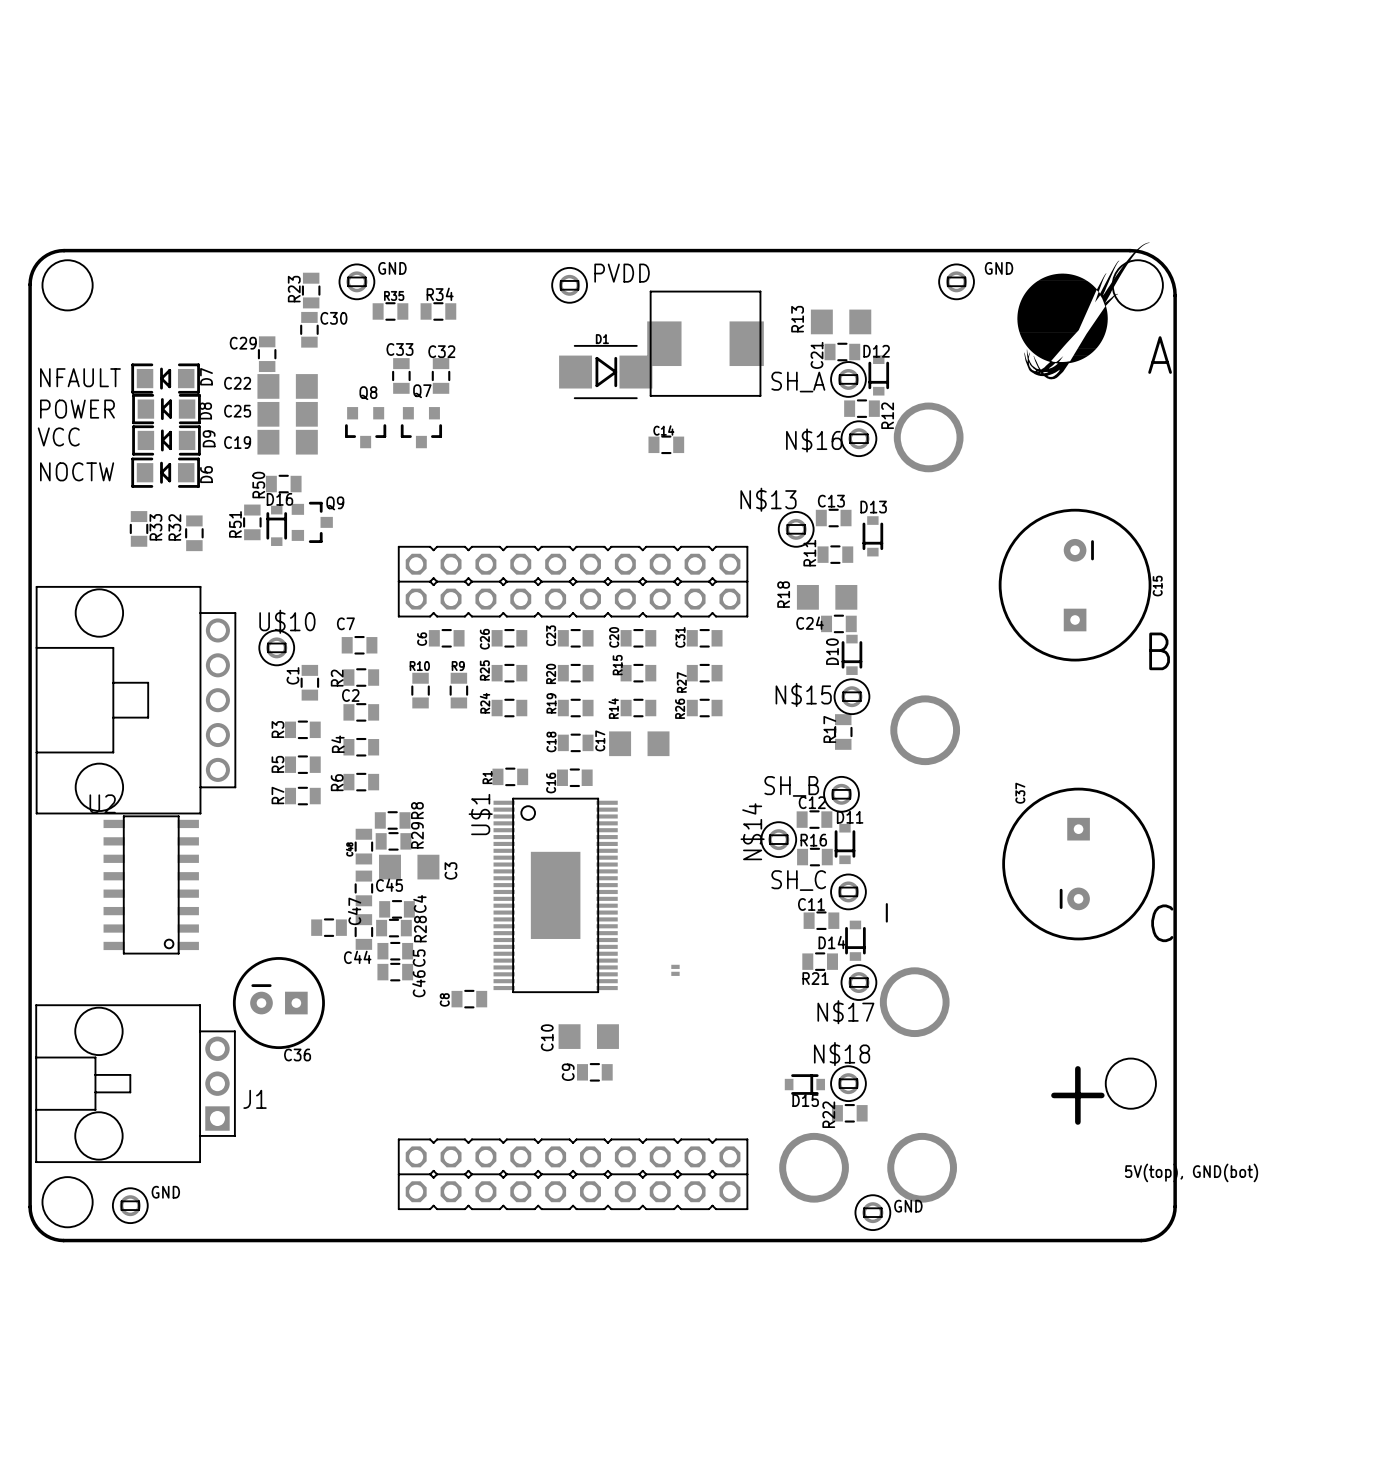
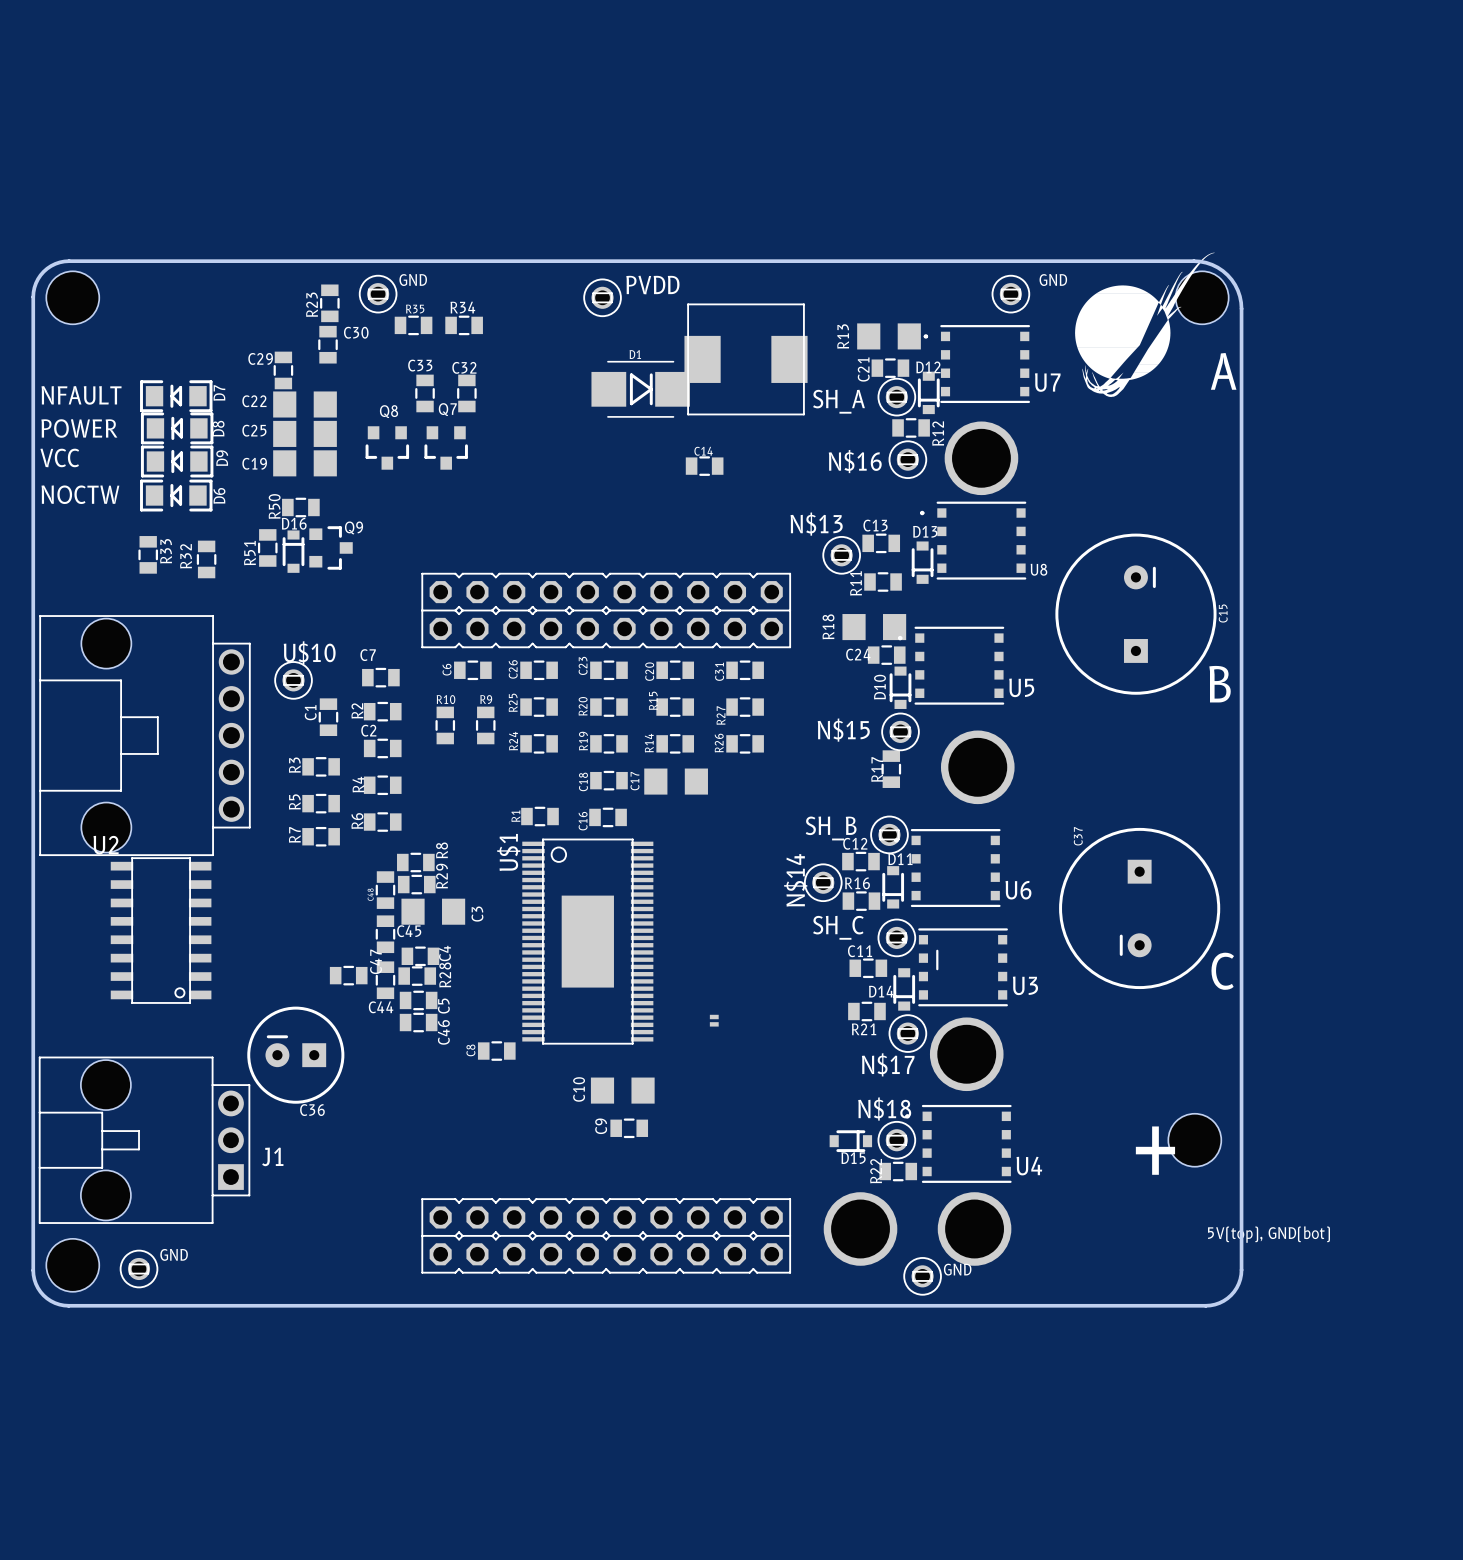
U7: none -> (976, 364)
U8: none -> (973, 540)
U5: none -> (951, 665)
U6: none -> (947, 868)
U3: none -> (954, 967)
U4: none -> (958, 1143)

